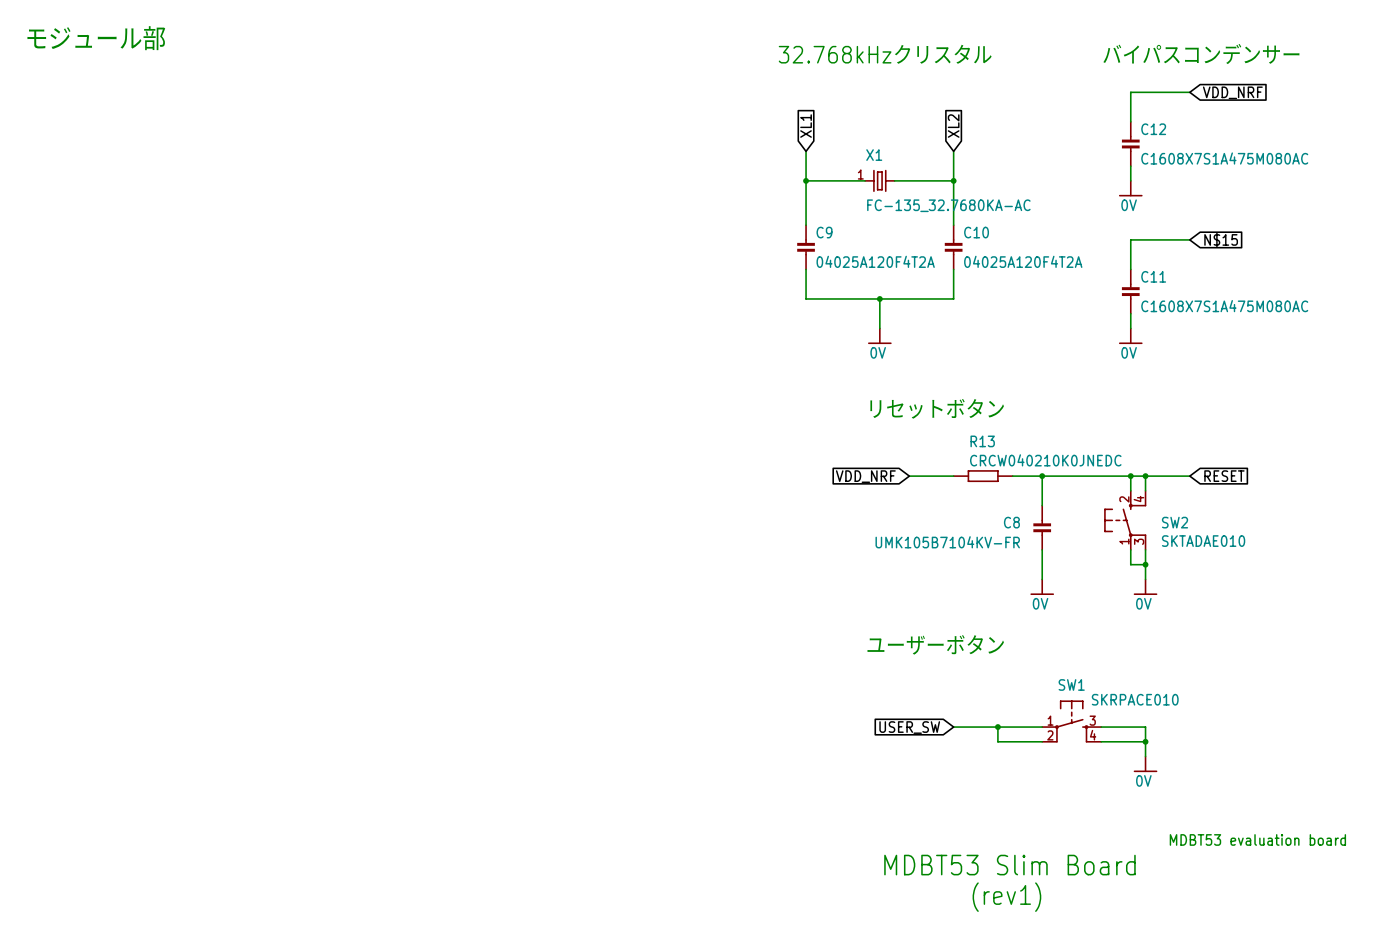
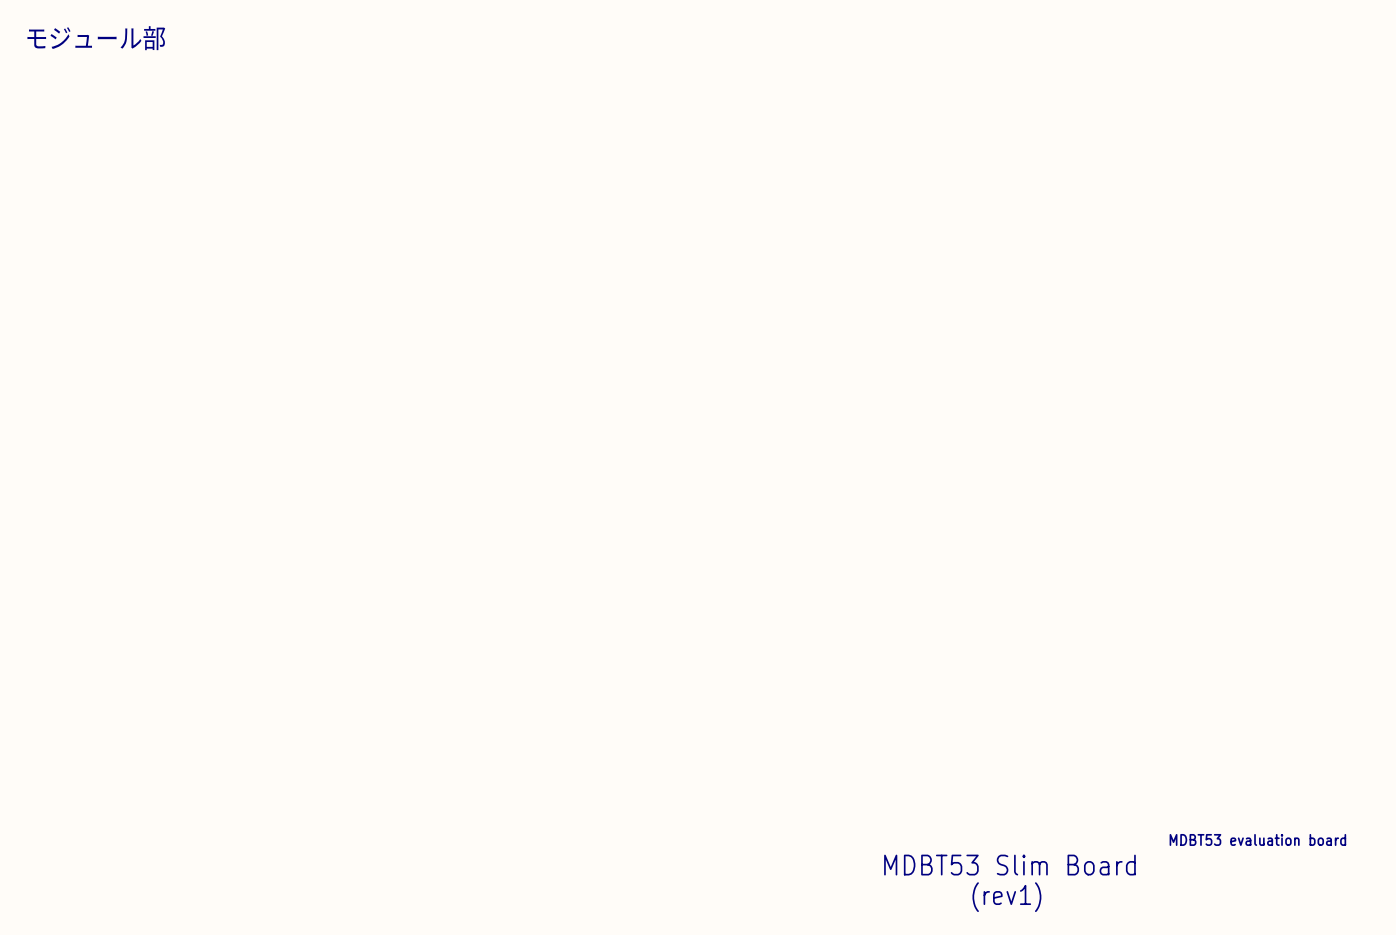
text: 32.768kHzクリスタル (885, 54) -> none
text: バイパスコンデンサー (1201, 54) -> none
wire: (1189, 92) (1130, 92) (1130, 121) -> none
global label: VDD_NRF (1232, 92) -> none
global label: XL1 (806, 126) -> none
global label: XL2 (953, 126) -> none
C12: C1608X7S1A475M080AC (1130, 143) -> none
wire: (806, 151) (806, 225) -> none
wire: (953, 151) (953, 225) -> none
wire: (1130, 166) (1130, 180) -> none
wire: (806, 180) (865, 180) -> none
junction: (806, 180) -> none
X1: FC-135_32.7680KA-AC (879, 180) -> none
wire: (894, 180) (953, 180) -> none
junction: (953, 180) -> none
power symbol: 0V (1130, 188) -> none
wire: (1189, 239) (1130, 239) (1130, 269) -> none
global label: N$15 (1221, 239) -> none
C9: 04025A120F4T2A (806, 247) -> none
C10: 04025A120F4T2A (953, 247) -> none
wire: (806, 269) (806, 298) (953, 298) (953, 269) -> none
C11: C1608X7S1A475M080AC (1130, 291) -> none
wire: (879, 298) (879, 328) -> none
junction: (879, 298) -> none
wire: (1130, 313) (1130, 328) -> none
power symbol: 0V (879, 336) -> none
power symbol: 0V (1130, 336) -> none
text: リセットボタン (937, 408) -> none
global label: VDD_NRF (865, 476) -> none
wire: (909, 476) (953, 476) -> none
R13: CRCW040210K0JNEDC (983, 476) -> none
wire: (1012, 476) (1189, 476) -> none
wire: (1042, 476) (1042, 505) -> none
junction: (1042, 476) -> none
wire: (1130, 476) (1130, 490) -> none
junction: (1130, 476) -> none
wire: (1145, 476) (1145, 490) -> none
junction: (1145, 476) -> none
global label: RESET (1224, 476) -> none
SW2: SKTADAE010 (1125, 520) -> none
C8: UMK105B7104KV-FR (1042, 527) -> none
wire: (1042, 549) (1042, 579) -> none
wire: (1130, 549) (1130, 564) (1145, 564) -> none
wire: (1145, 549) (1145, 579) -> none
junction: (1145, 564) -> none
power symbol: 0V (1042, 587) -> none
power symbol: 0V (1145, 587) -> none
text: ユーザーボタン (935, 644) -> none
SW1: SKRPACE010 (1071, 721) -> none
global label: USER_SW (909, 727) -> none
wire: (953, 727) (1042, 727) -> none
wire: (997, 727) (997, 741) (1042, 741) -> none
junction: (997, 727) -> none
wire: (1101, 727) (1145, 727) (1145, 756) -> none
wire: (1101, 741) (1145, 741) -> none
junction: (1145, 741) -> none
power symbol: 0V (1145, 764) -> none

